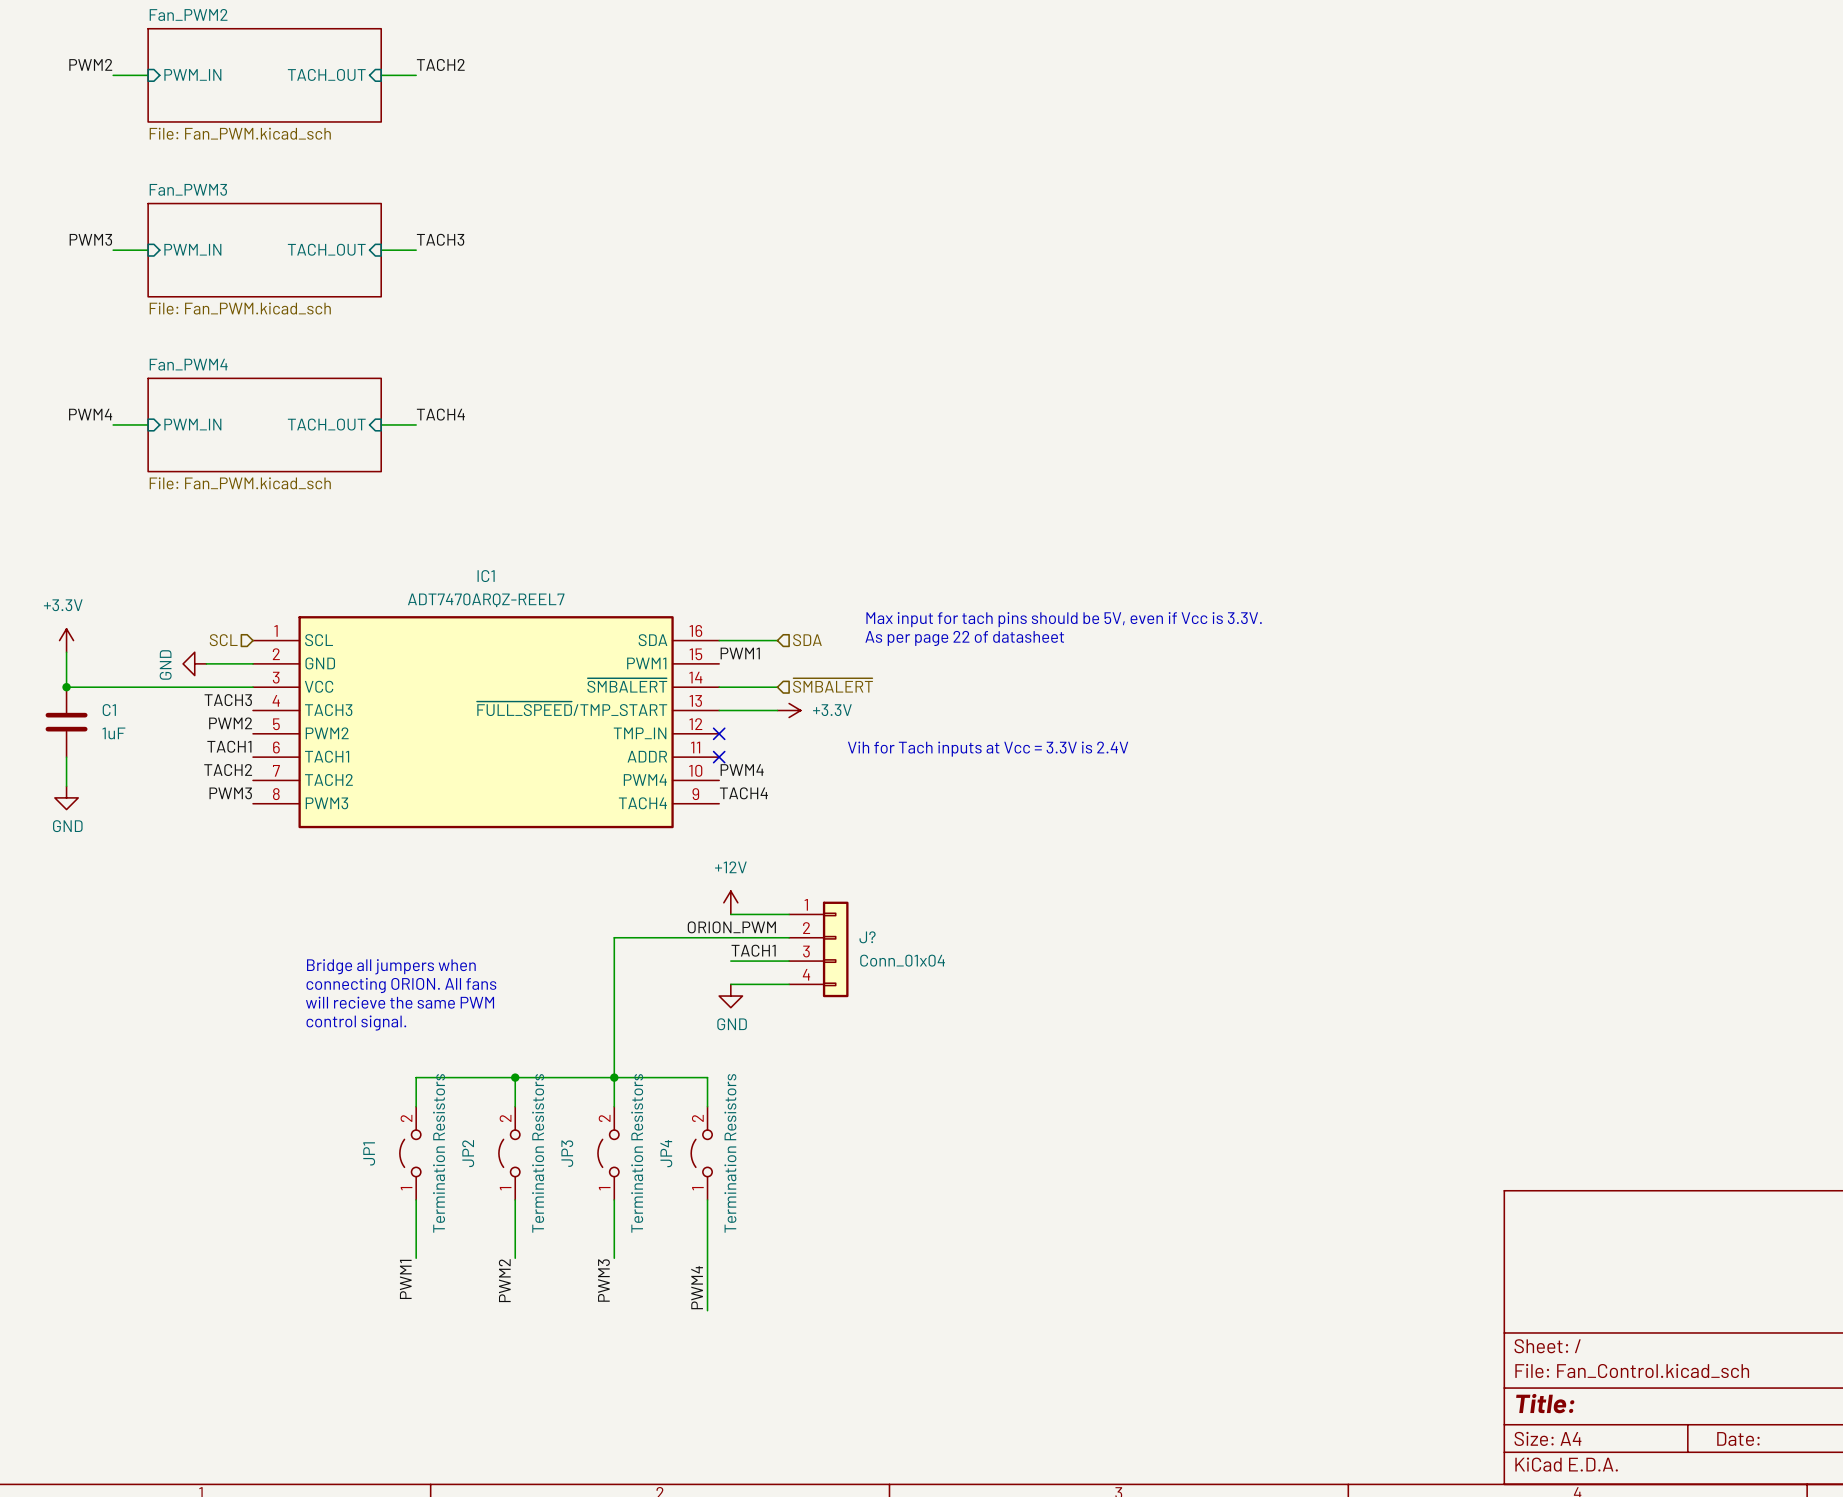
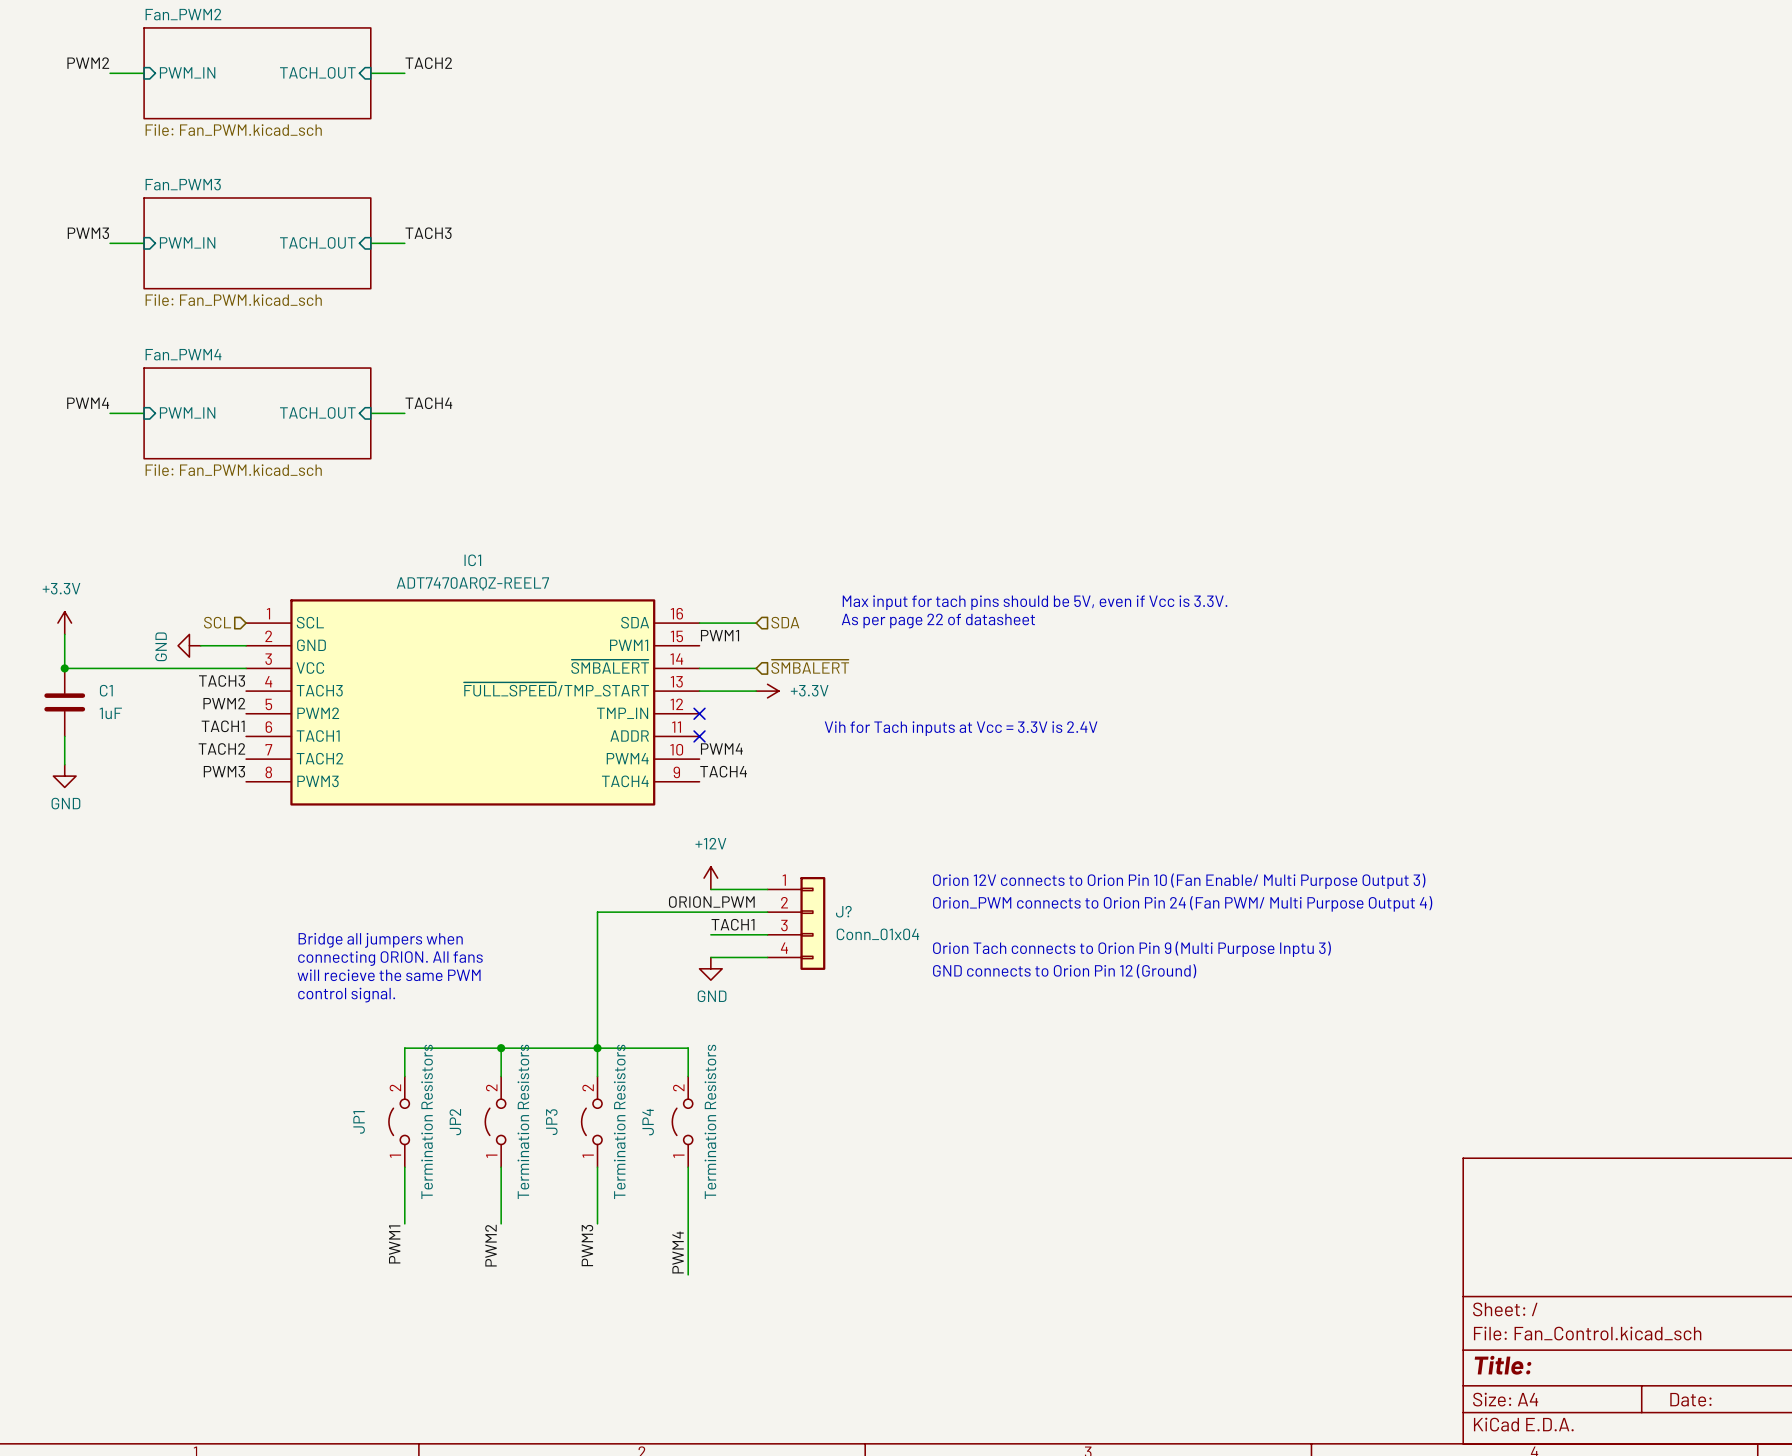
text: none -> Orion 12V connects to Orion Pin 10 (Fan Enable/ Multi Purpose Output 3) (1179, 881)
text: none -> Orion_PWM connects to Orion Pin 24 (Fan PWM/ Multi Purpose Output 4) (1182, 903)
text: none -> Orion Tach connects to Orion Pin 9 (Multi Purpose Inptu 3) (1131, 949)
text: none -> GND connects to Orion Pin 12 (Ground) (1064, 971)

